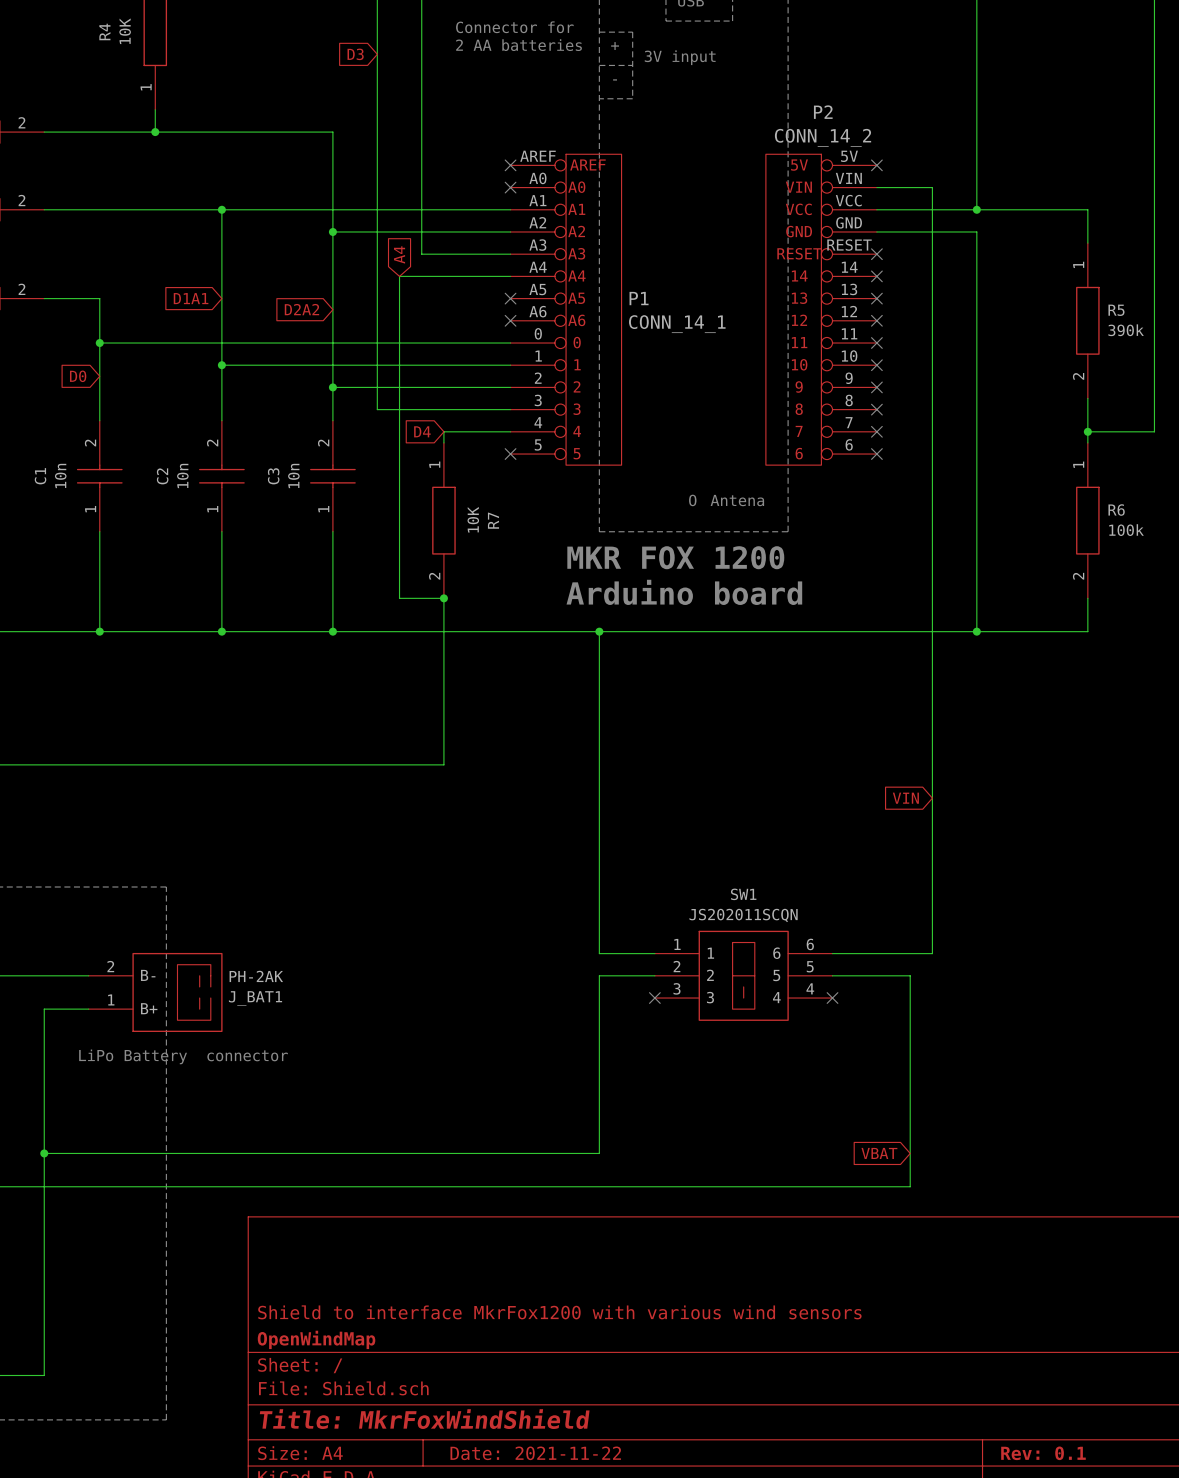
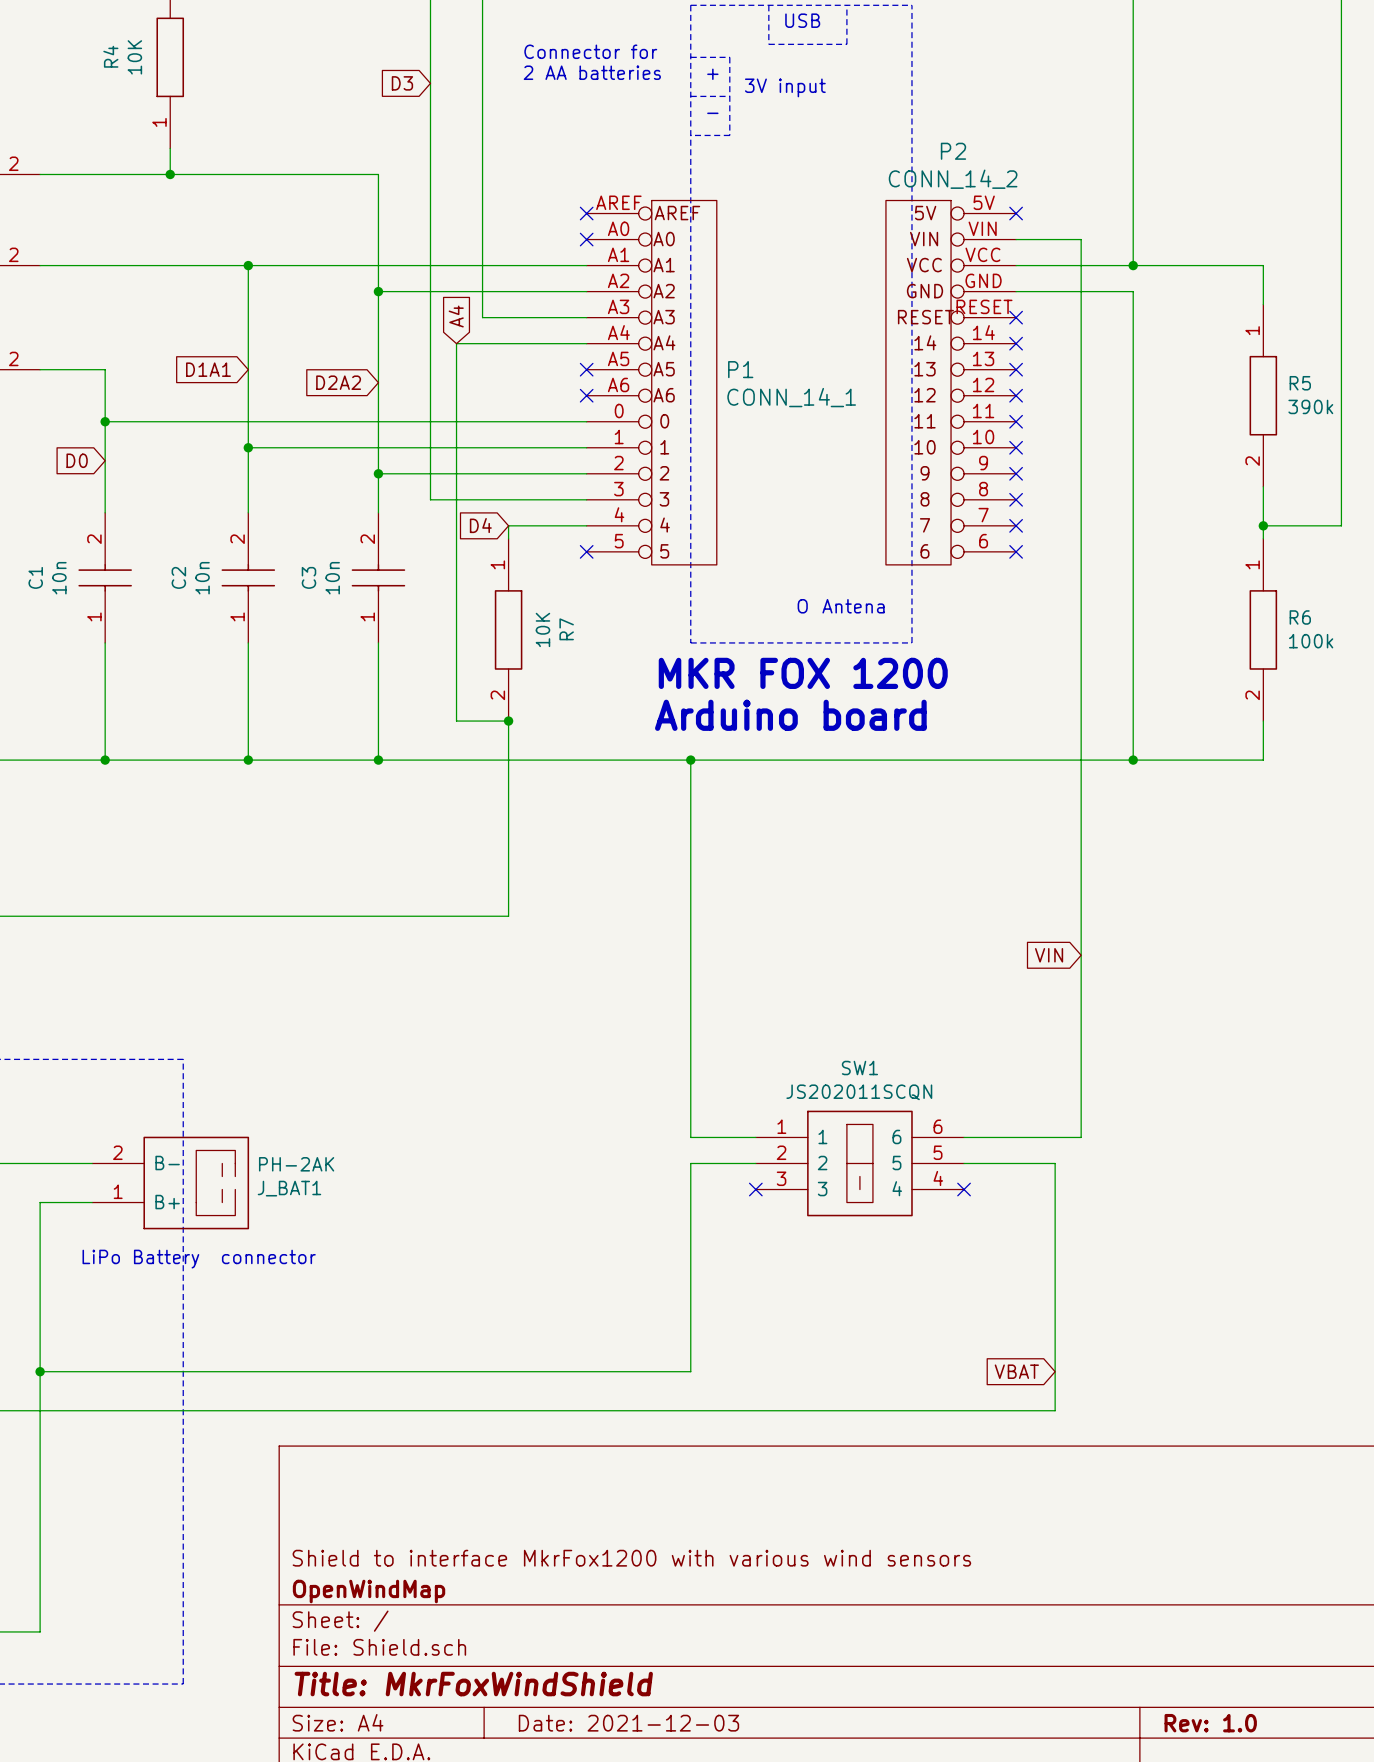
title block: Date: 2021-11-22 (535, 1453) -> Date: 2021-12-03 (628, 1723)
title block: Rev: 0.1 (1043, 1453) -> Rev: 1.0 (1210, 1723)

